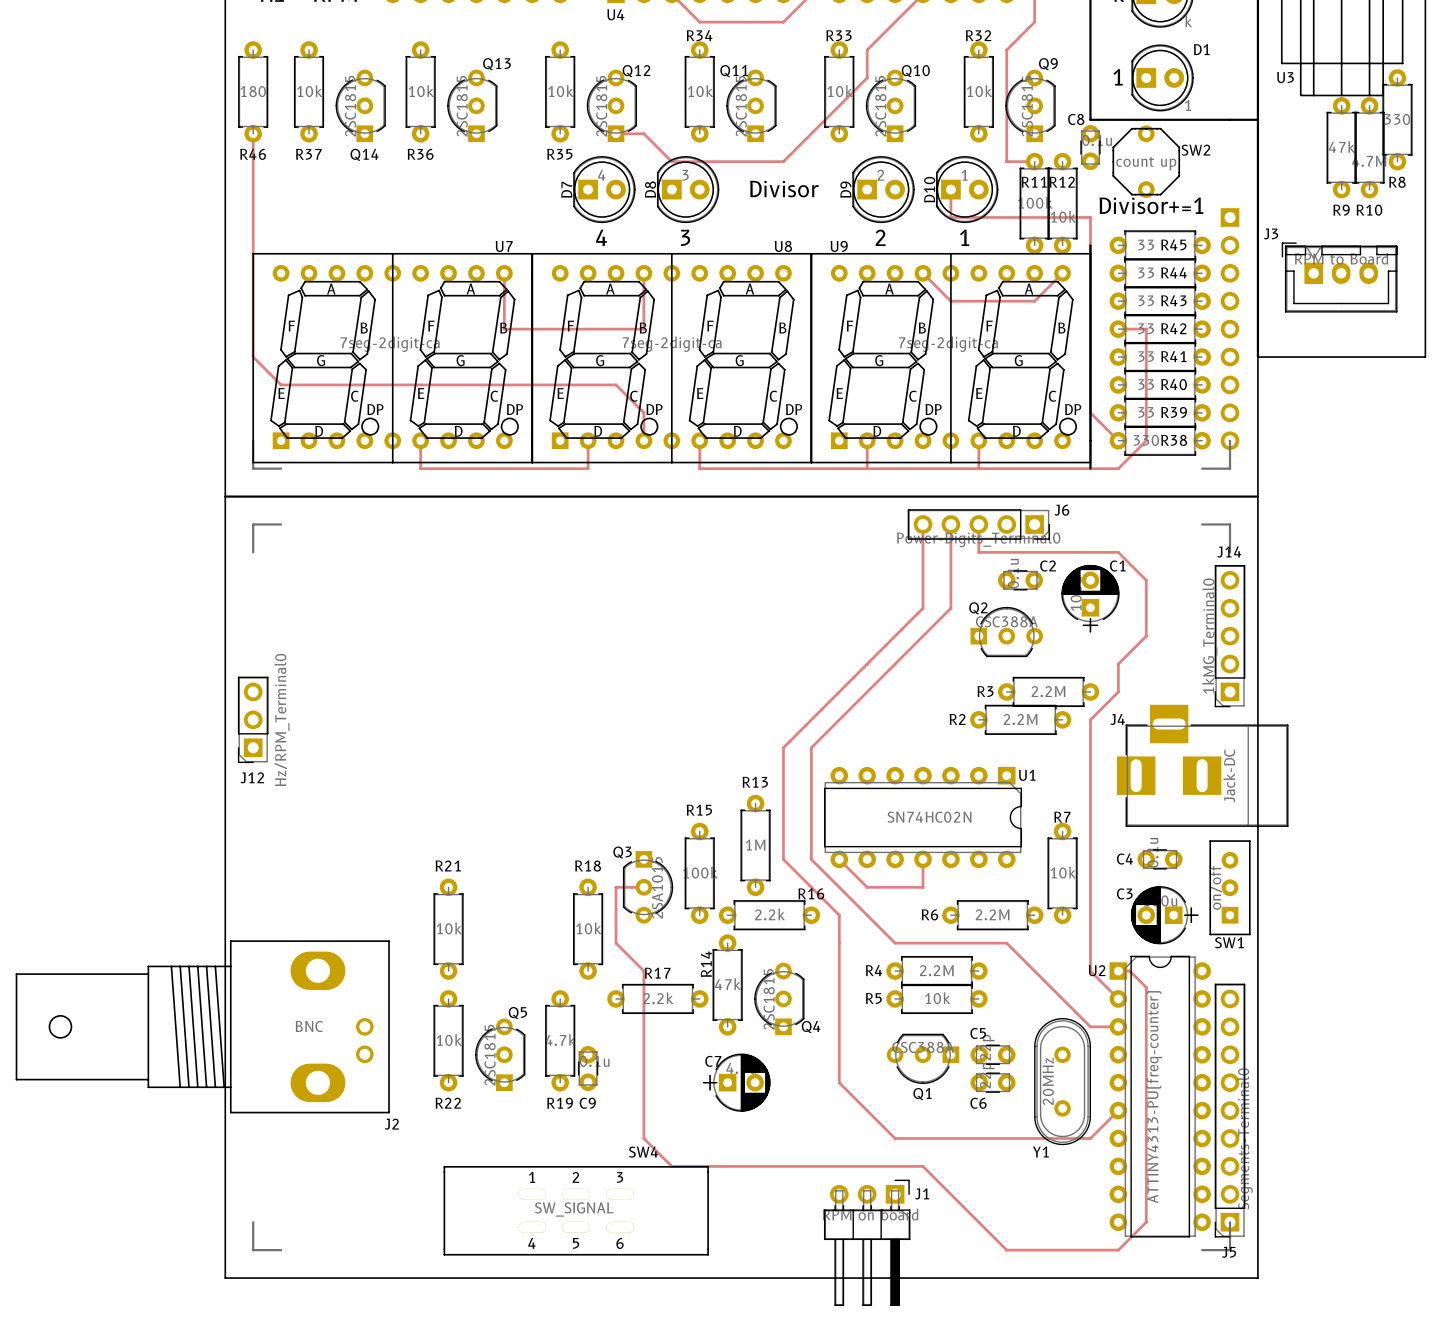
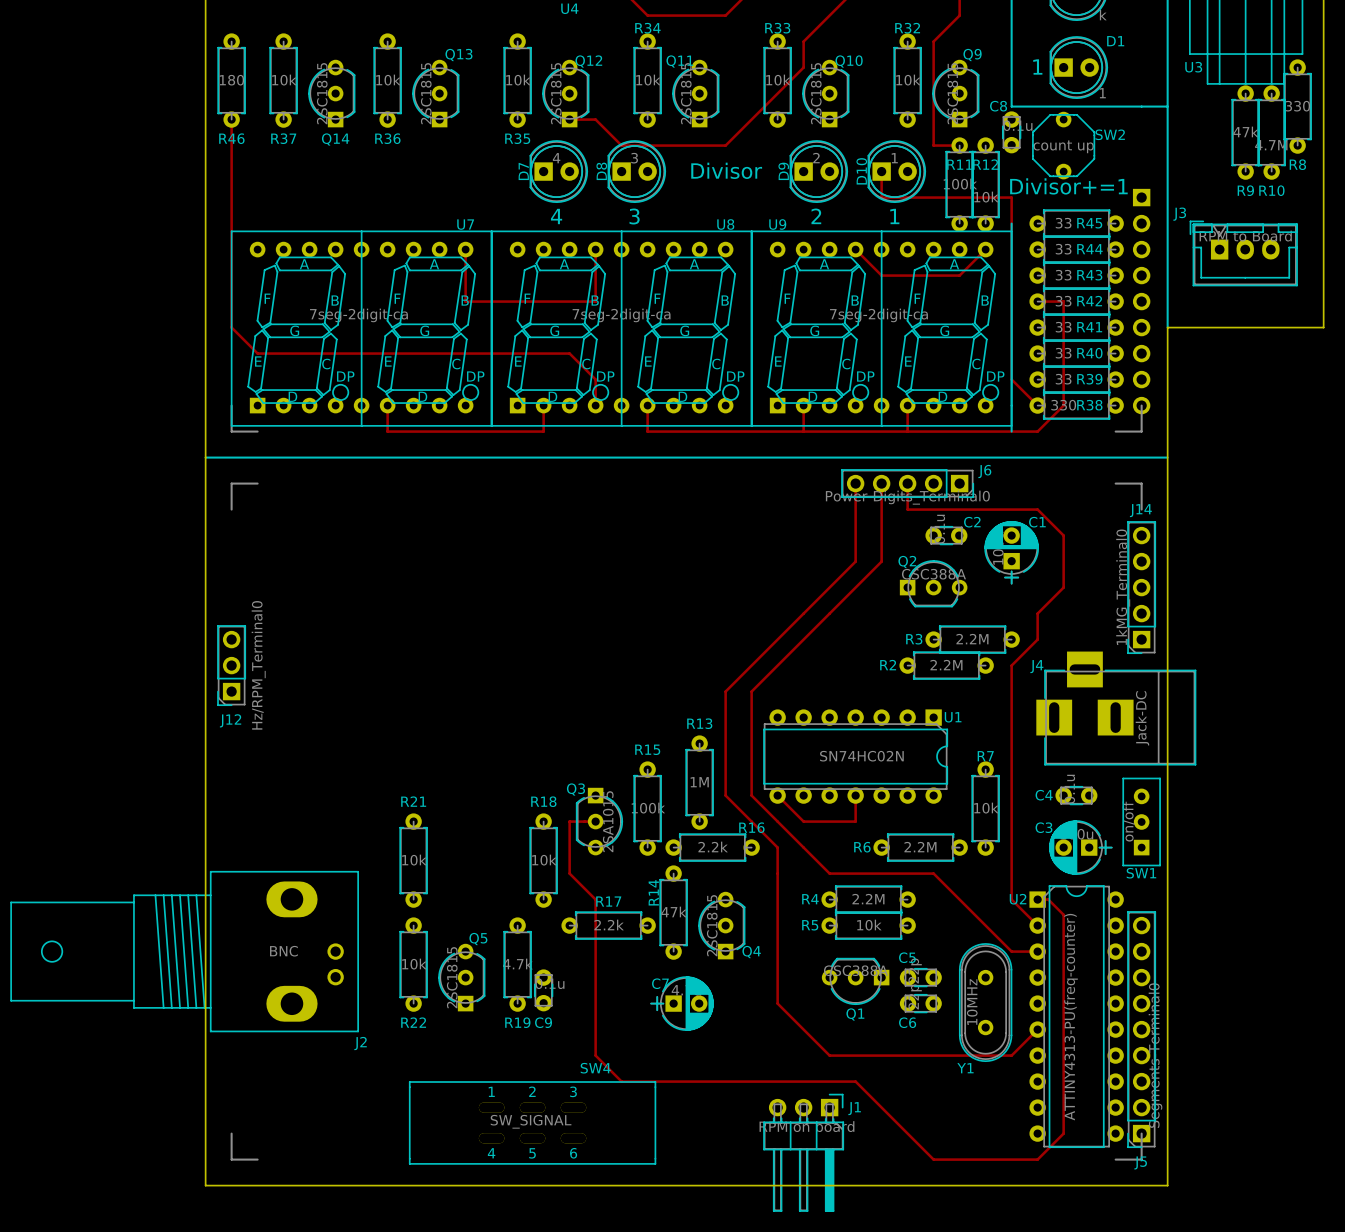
Y1 value: 20MHz (1048, 1081) -> 10MHz (972, 1002)

